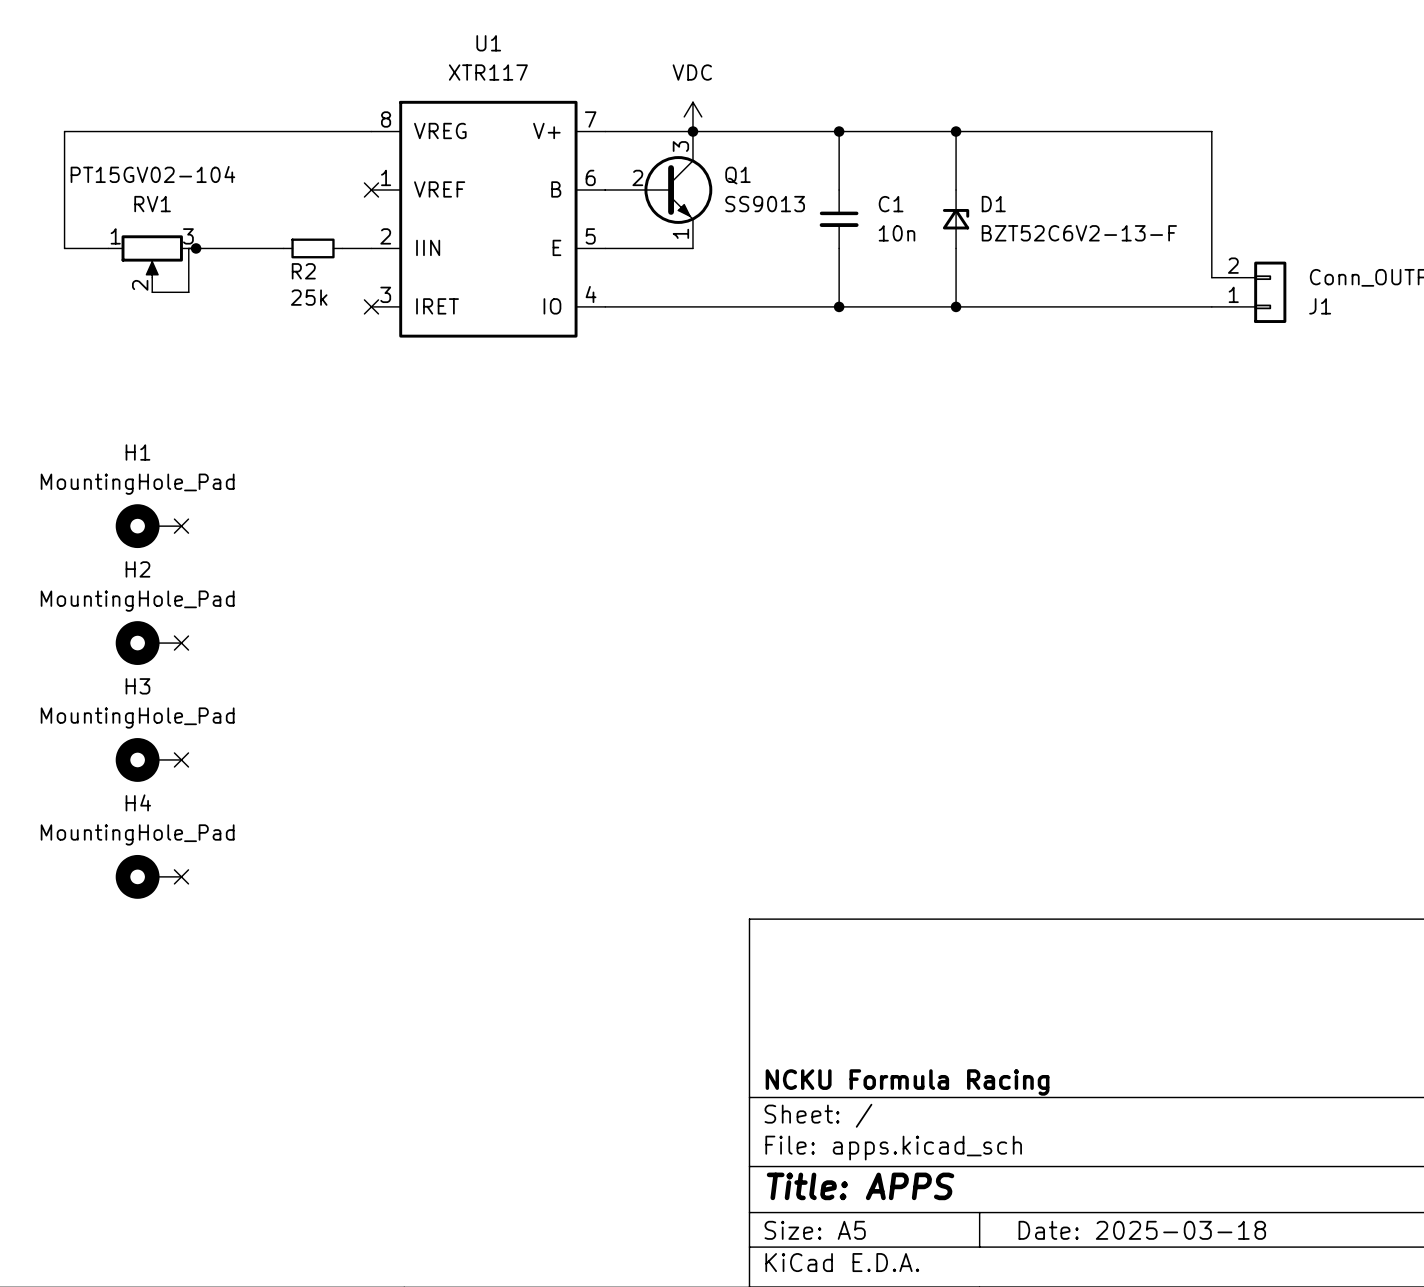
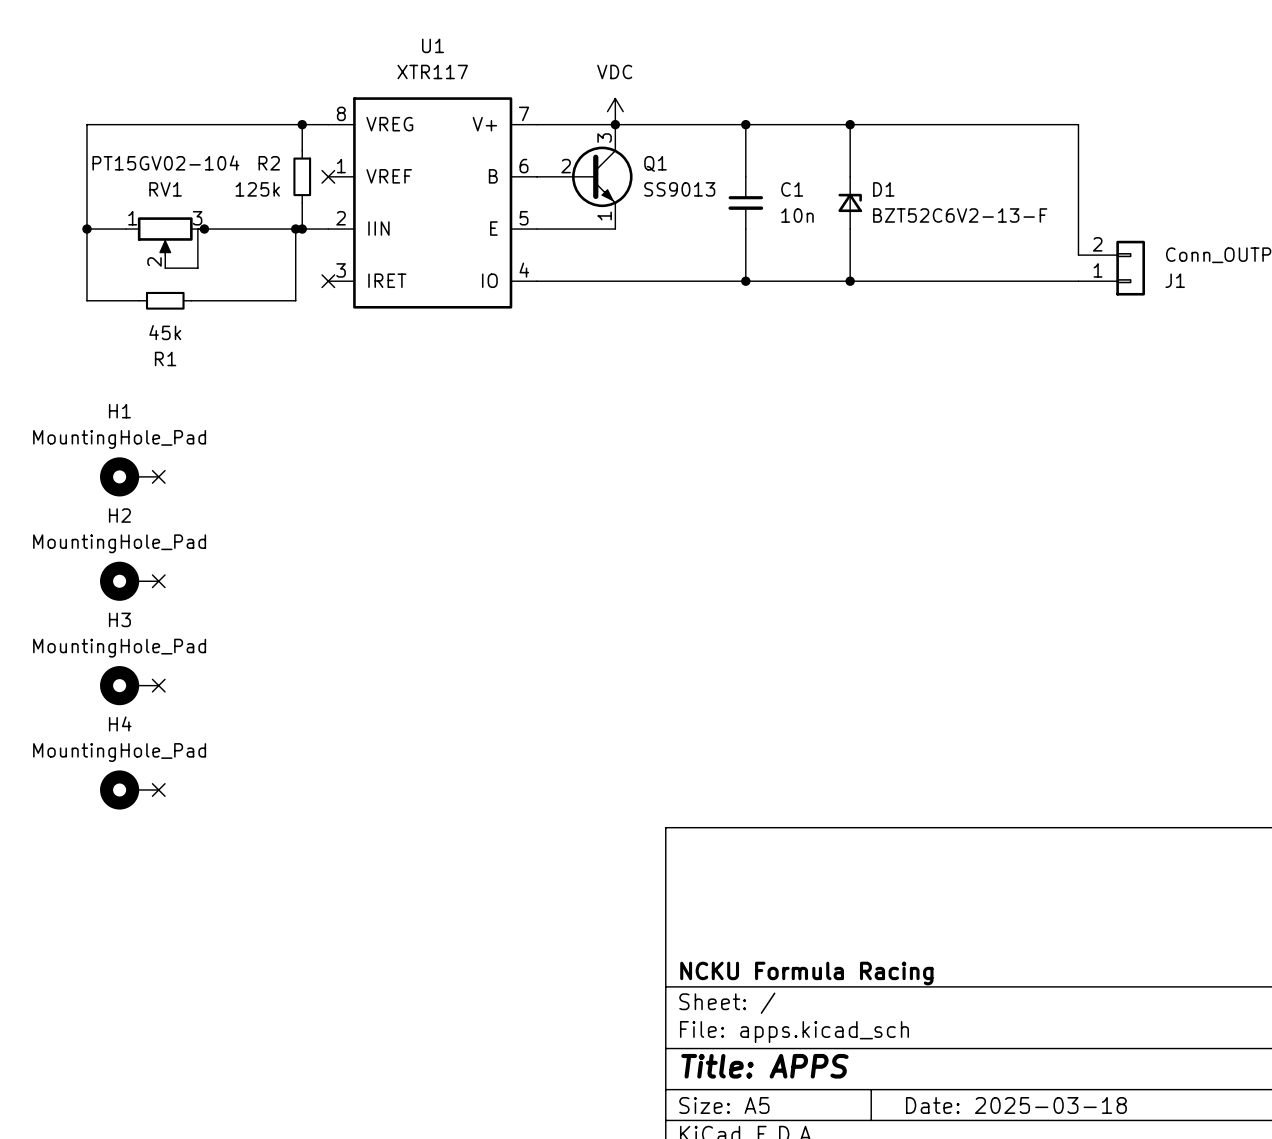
wire: (101, 131) (64, 131) (64, 248) (101, 248) -> (86, 124) (86, 300) (139, 300)
wire: none -> (302, 124) (302, 150)
junction: none -> (302, 124)
wire: none -> (302, 202) (302, 229) (250, 229)
junction: none -> (86, 229)
wire: none -> (93, 229) (126, 229)
junction position: (196, 248) -> (204, 229)
wire: (225, 248) (188, 248) (188, 292) (152, 292) -> (197, 229) (197, 268) (165, 268)
R2 rotation: 0° (313, 248) -> 90° clockwise (302, 176)
R2 position: (313, 248) -> (302, 176)
wire: none -> (295, 229) (295, 300) (191, 300)
junction: none -> (295, 229)
junction: none -> (302, 229)
RV1 position: (152, 263) -> (165, 242)
R2 value: 25k (309, 297) -> 125k (257, 189)
R1: none -> 45k (165, 300)

